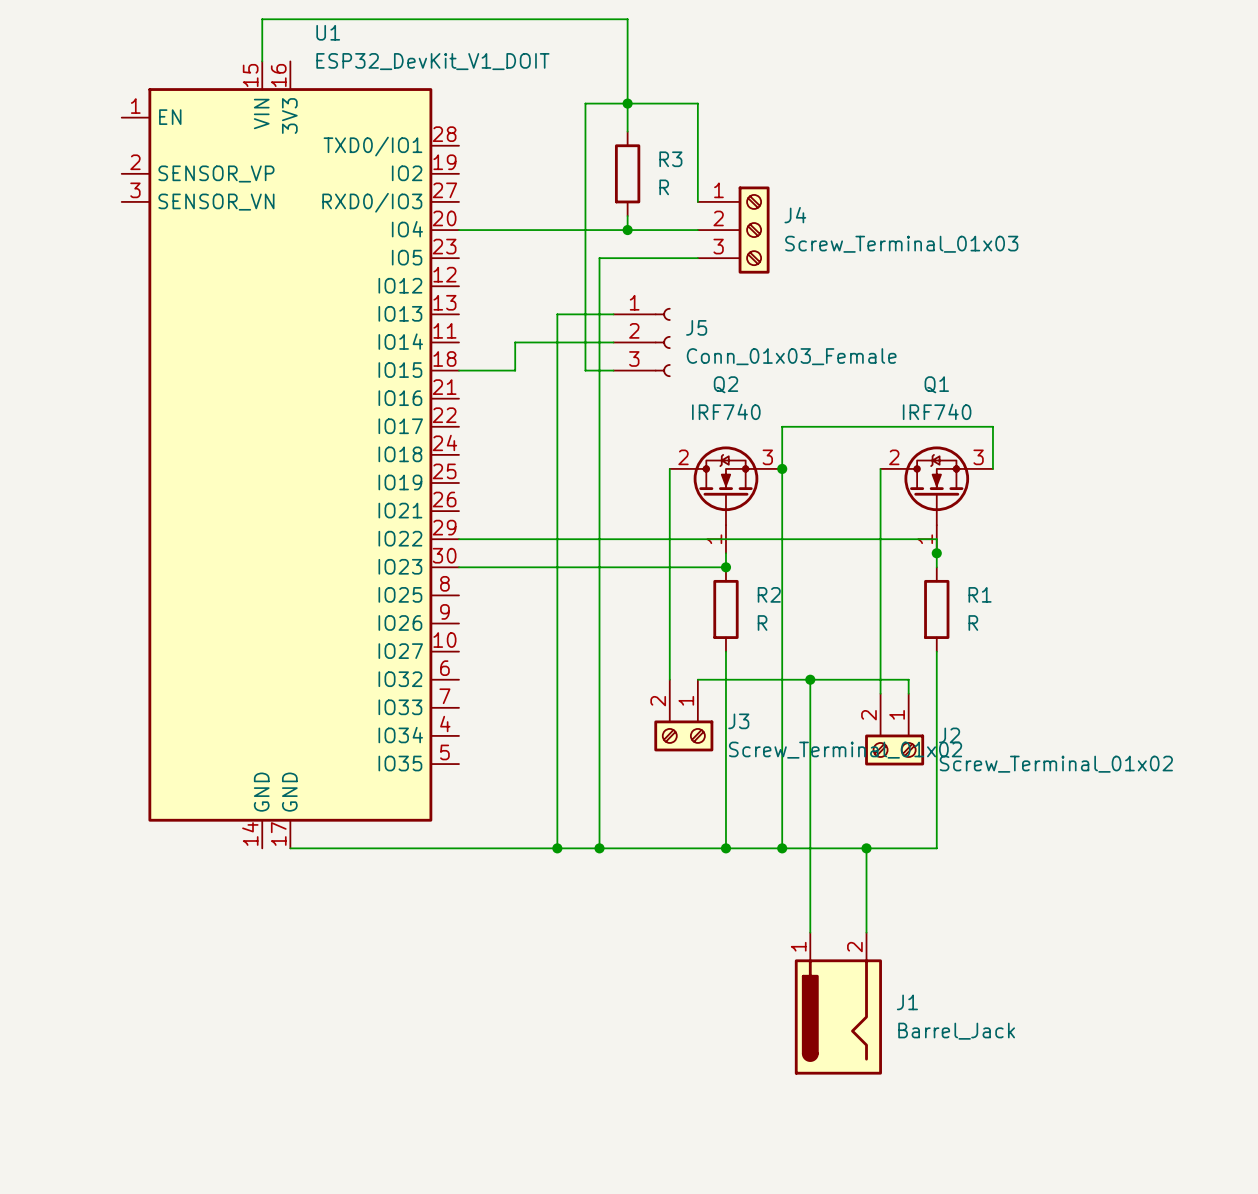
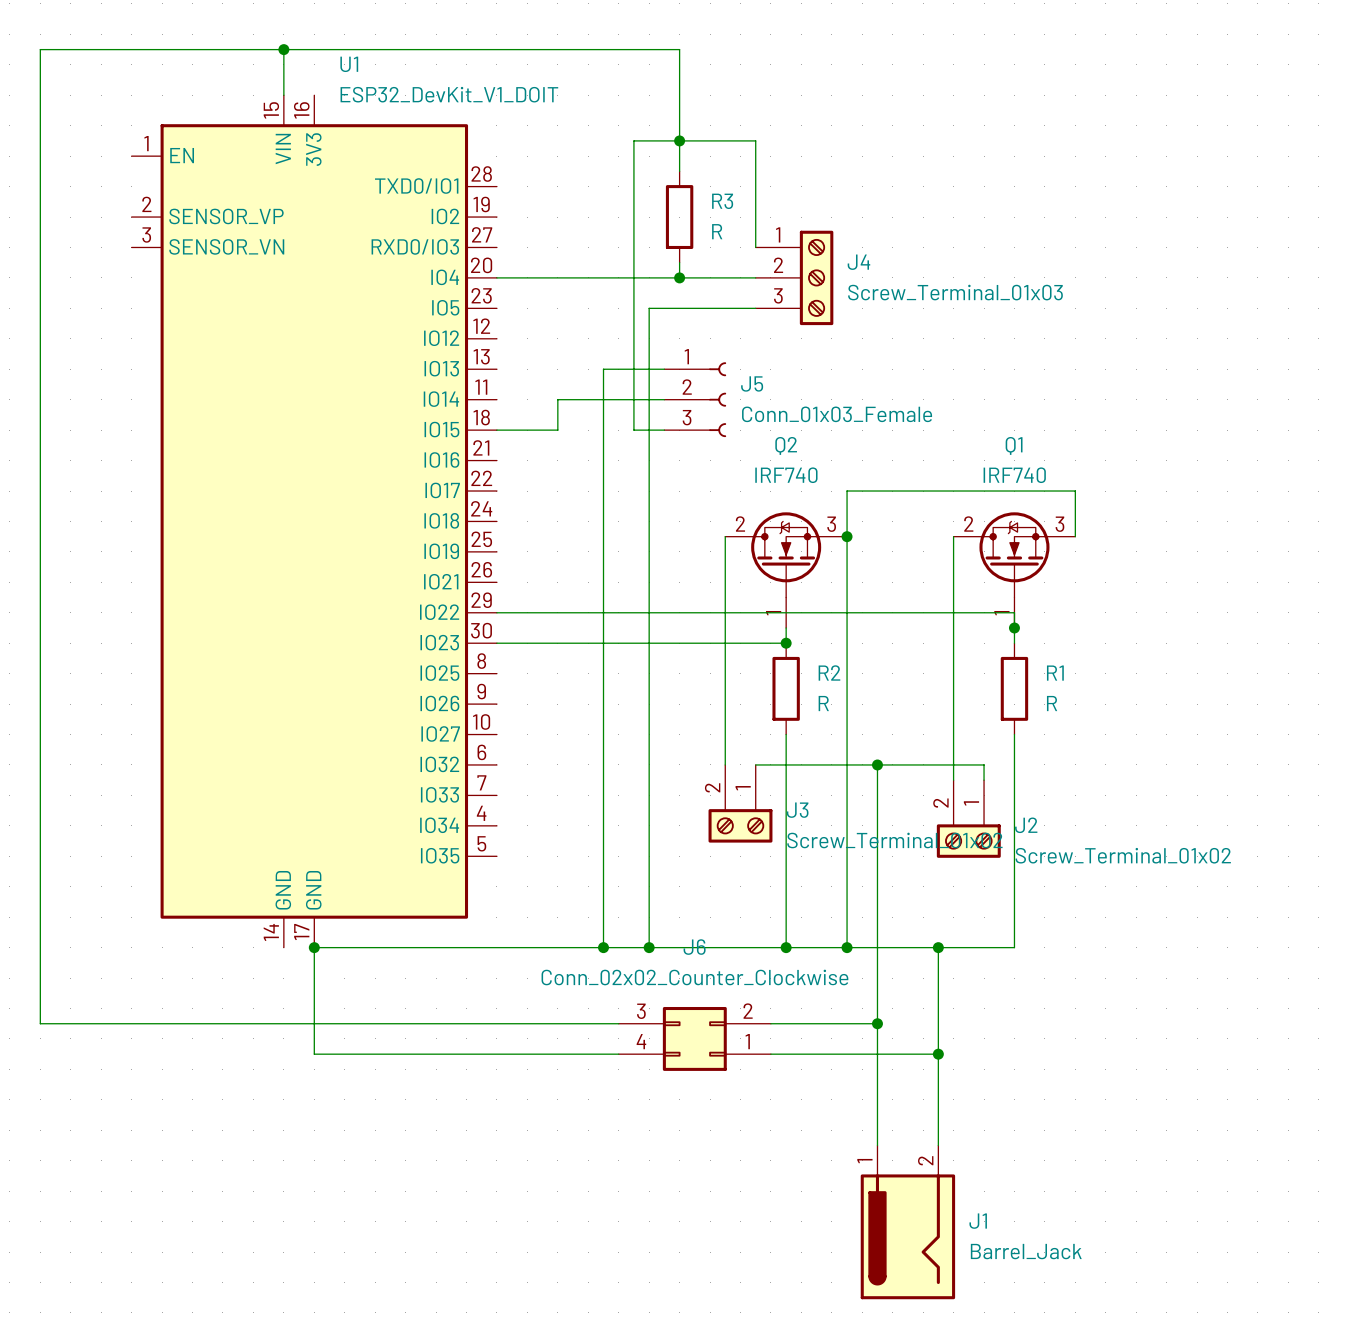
wire: none -> (283, 49) (40, 49) (40, 1023) (618, 1023)
junction: none -> (283, 49)
wire: none -> (314, 947) (314, 1054) (618, 1054)
junction: none -> (314, 947)
wire: none -> (770, 1023) (877, 1023)
junction: none -> (877, 1023)
J6: none -> Conn_02x02_Counter_Clockwise (694, 1038)
J1 symbol: [794, 932, 882, 1075] -> [860, 1145, 956, 1300]
wire: none -> (770, 1054) (938, 1054)
junction: none -> (938, 1054)

